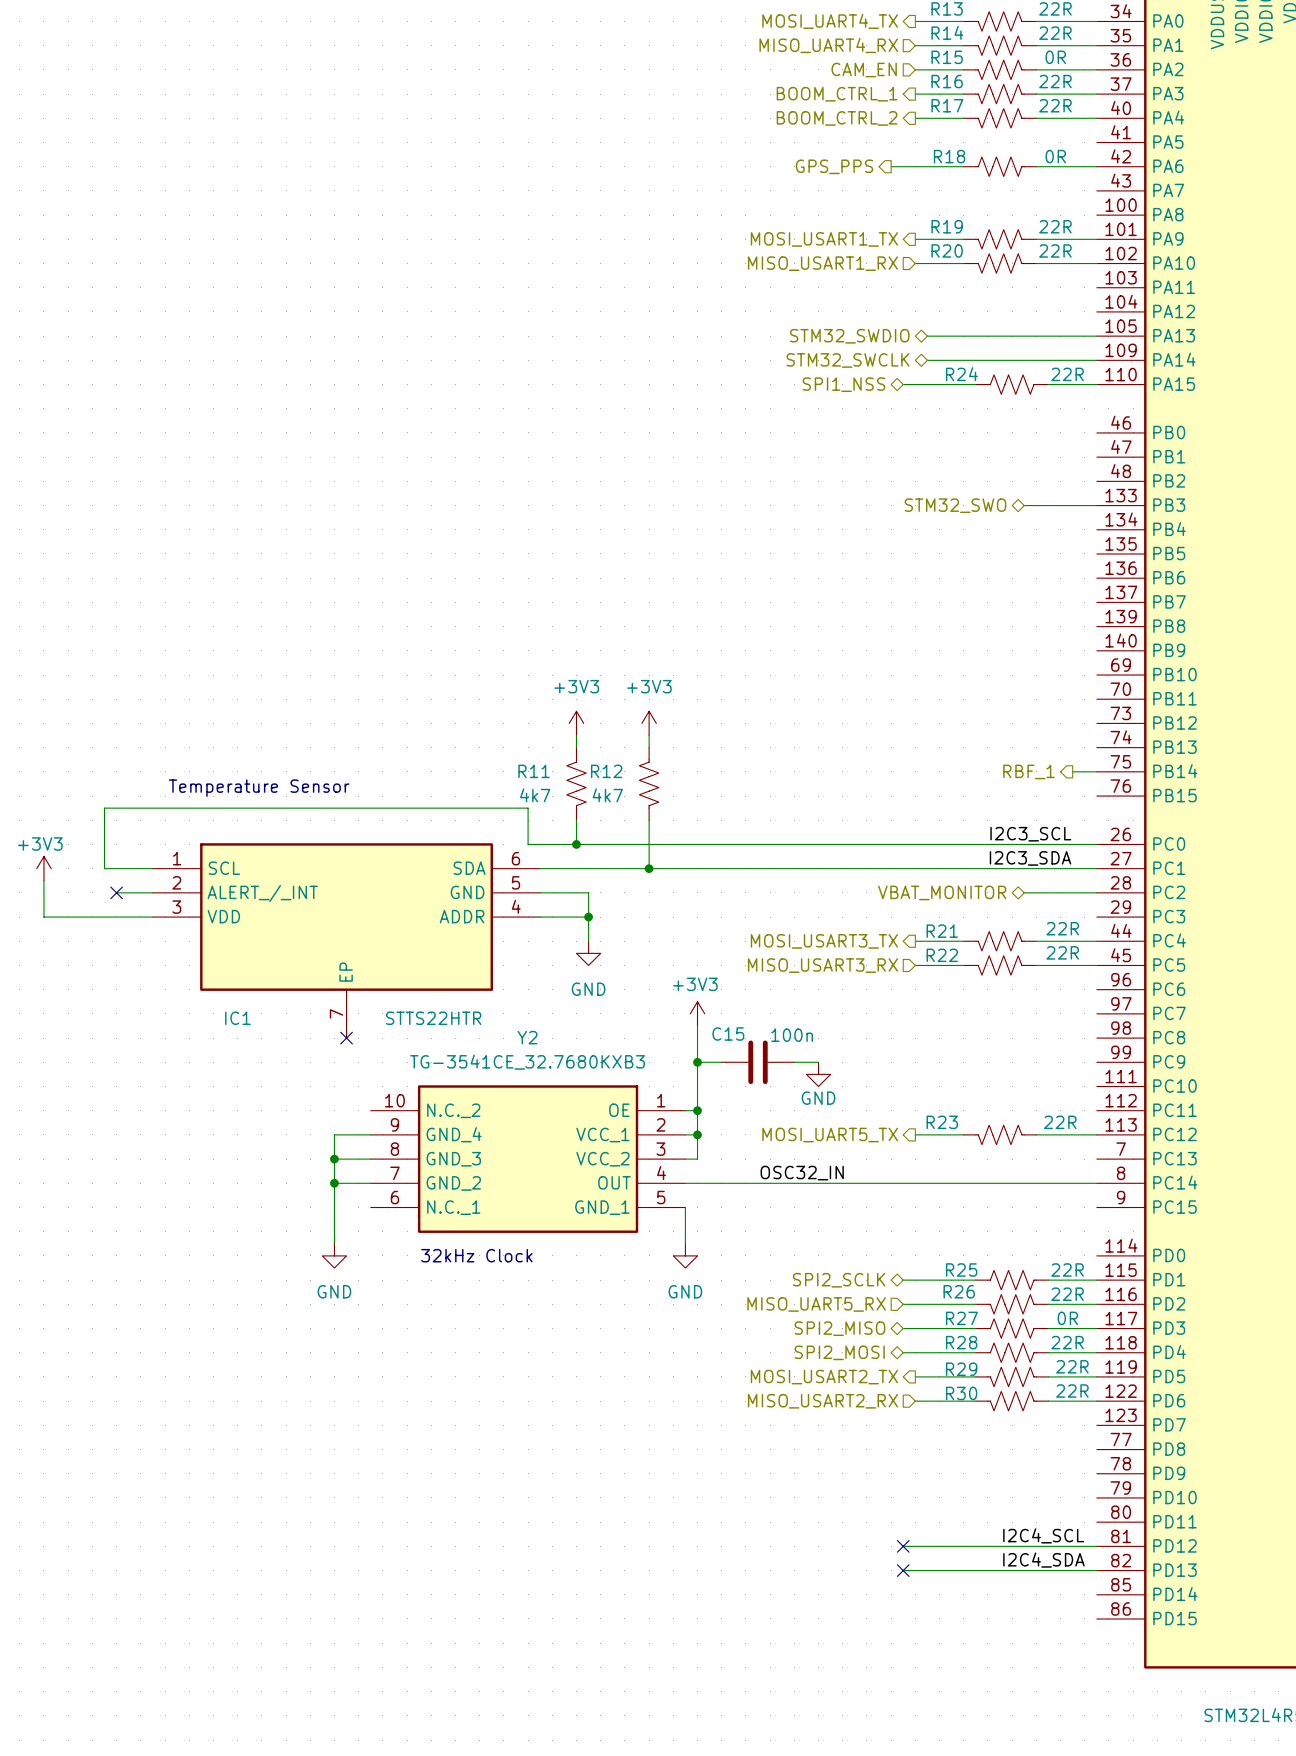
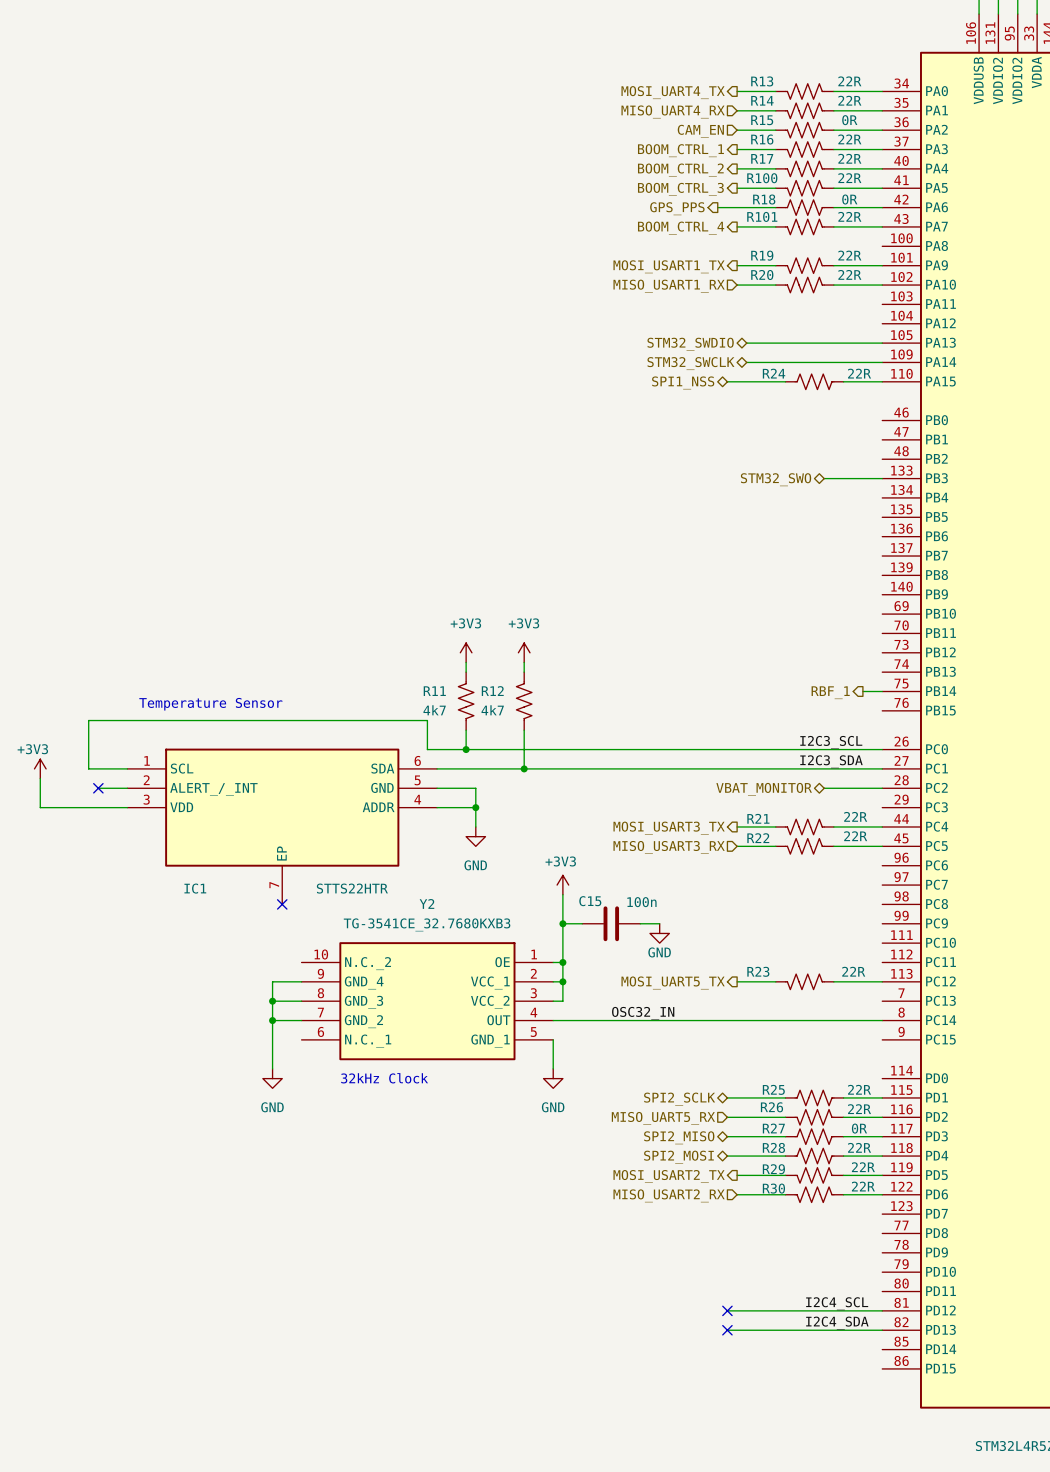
hierarchical label: none -> BOOM_CTRL_3 (680, 189)
wire: none -> (737, 188) (775, 188)
R100: none -> 22R (804, 188)
wire: none -> (833, 188) (882, 188)
hierarchical label: none -> BOOM_CTRL_4 (681, 228)
wire: none -> (737, 226) (775, 226)
R101: none -> 22R (804, 226)
wire: none -> (833, 226) (882, 226)

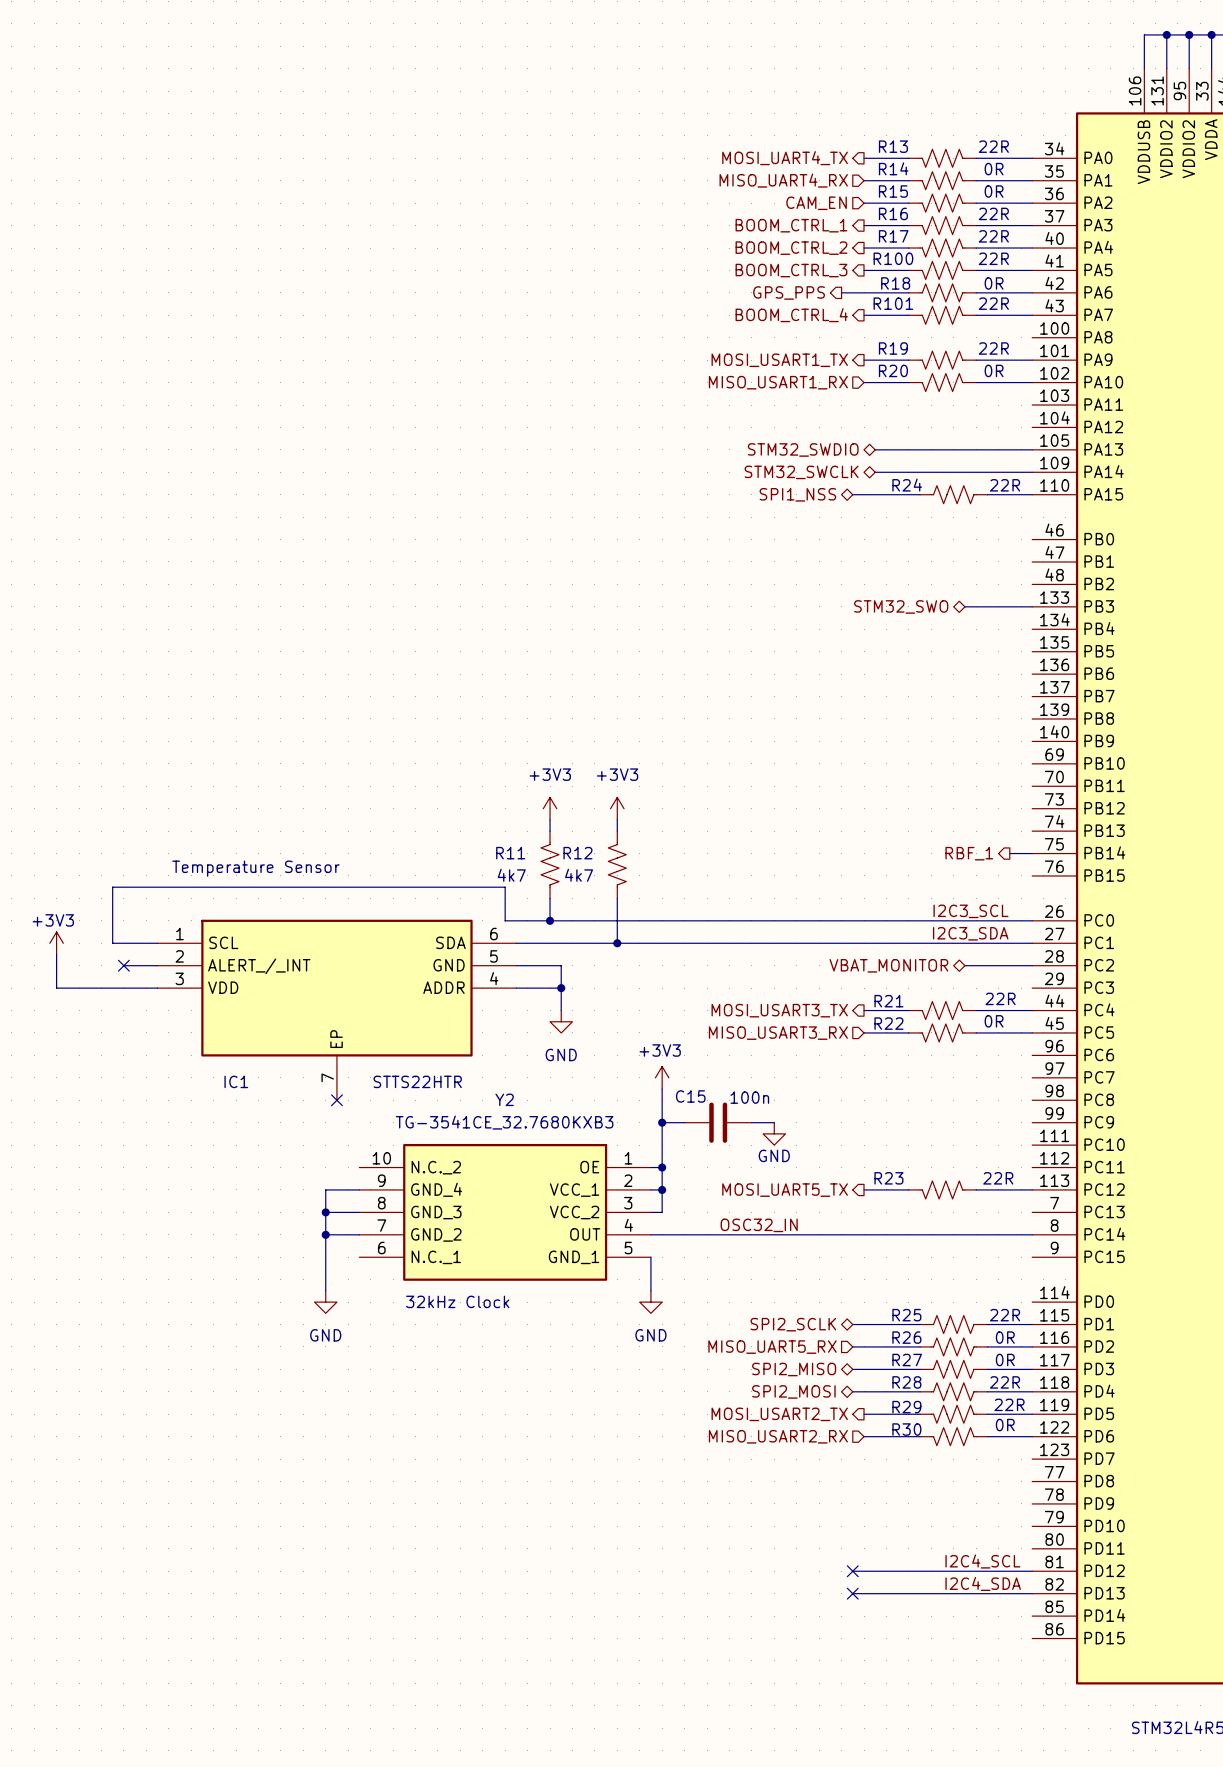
R14 value: 22R (849, 100) -> 0R (994, 169)
R20 value: 22R (849, 274) -> 0R (994, 370)
R22 value: 22R (855, 836) -> 0R (994, 1021)
R26 value: 22R (859, 1109) -> 0R (1005, 1337)
R26 flip: as is (814, 1117) -> left-right (953, 1346)
R30 value: 22R (863, 1186) -> 0R (1005, 1425)

